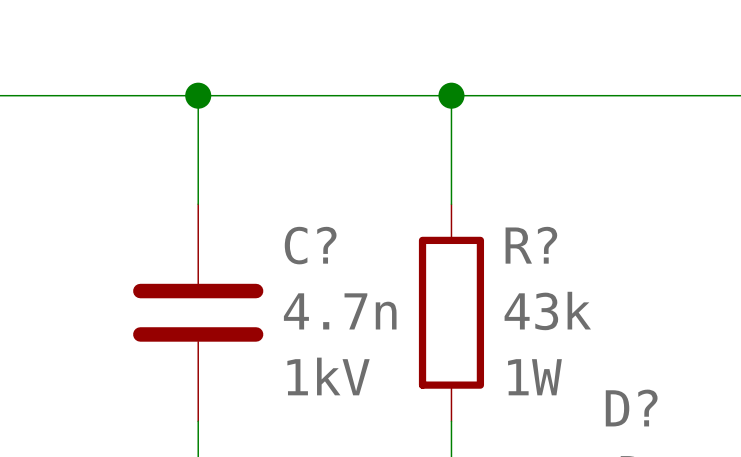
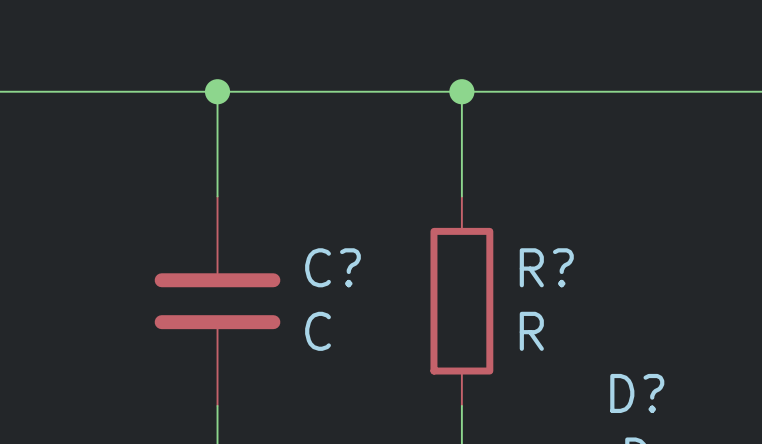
C? name position: C? (310, 245) -> C? (332, 267)
R? name position: R? (531, 245) -> R? (546, 267)
R? value: 43k (547, 310) -> R (531, 331)
C? value: 4.7n (340, 311) -> C (318, 331)
C? text: 1kV (328, 376) -> none
R? text: 1W (534, 377) -> none

